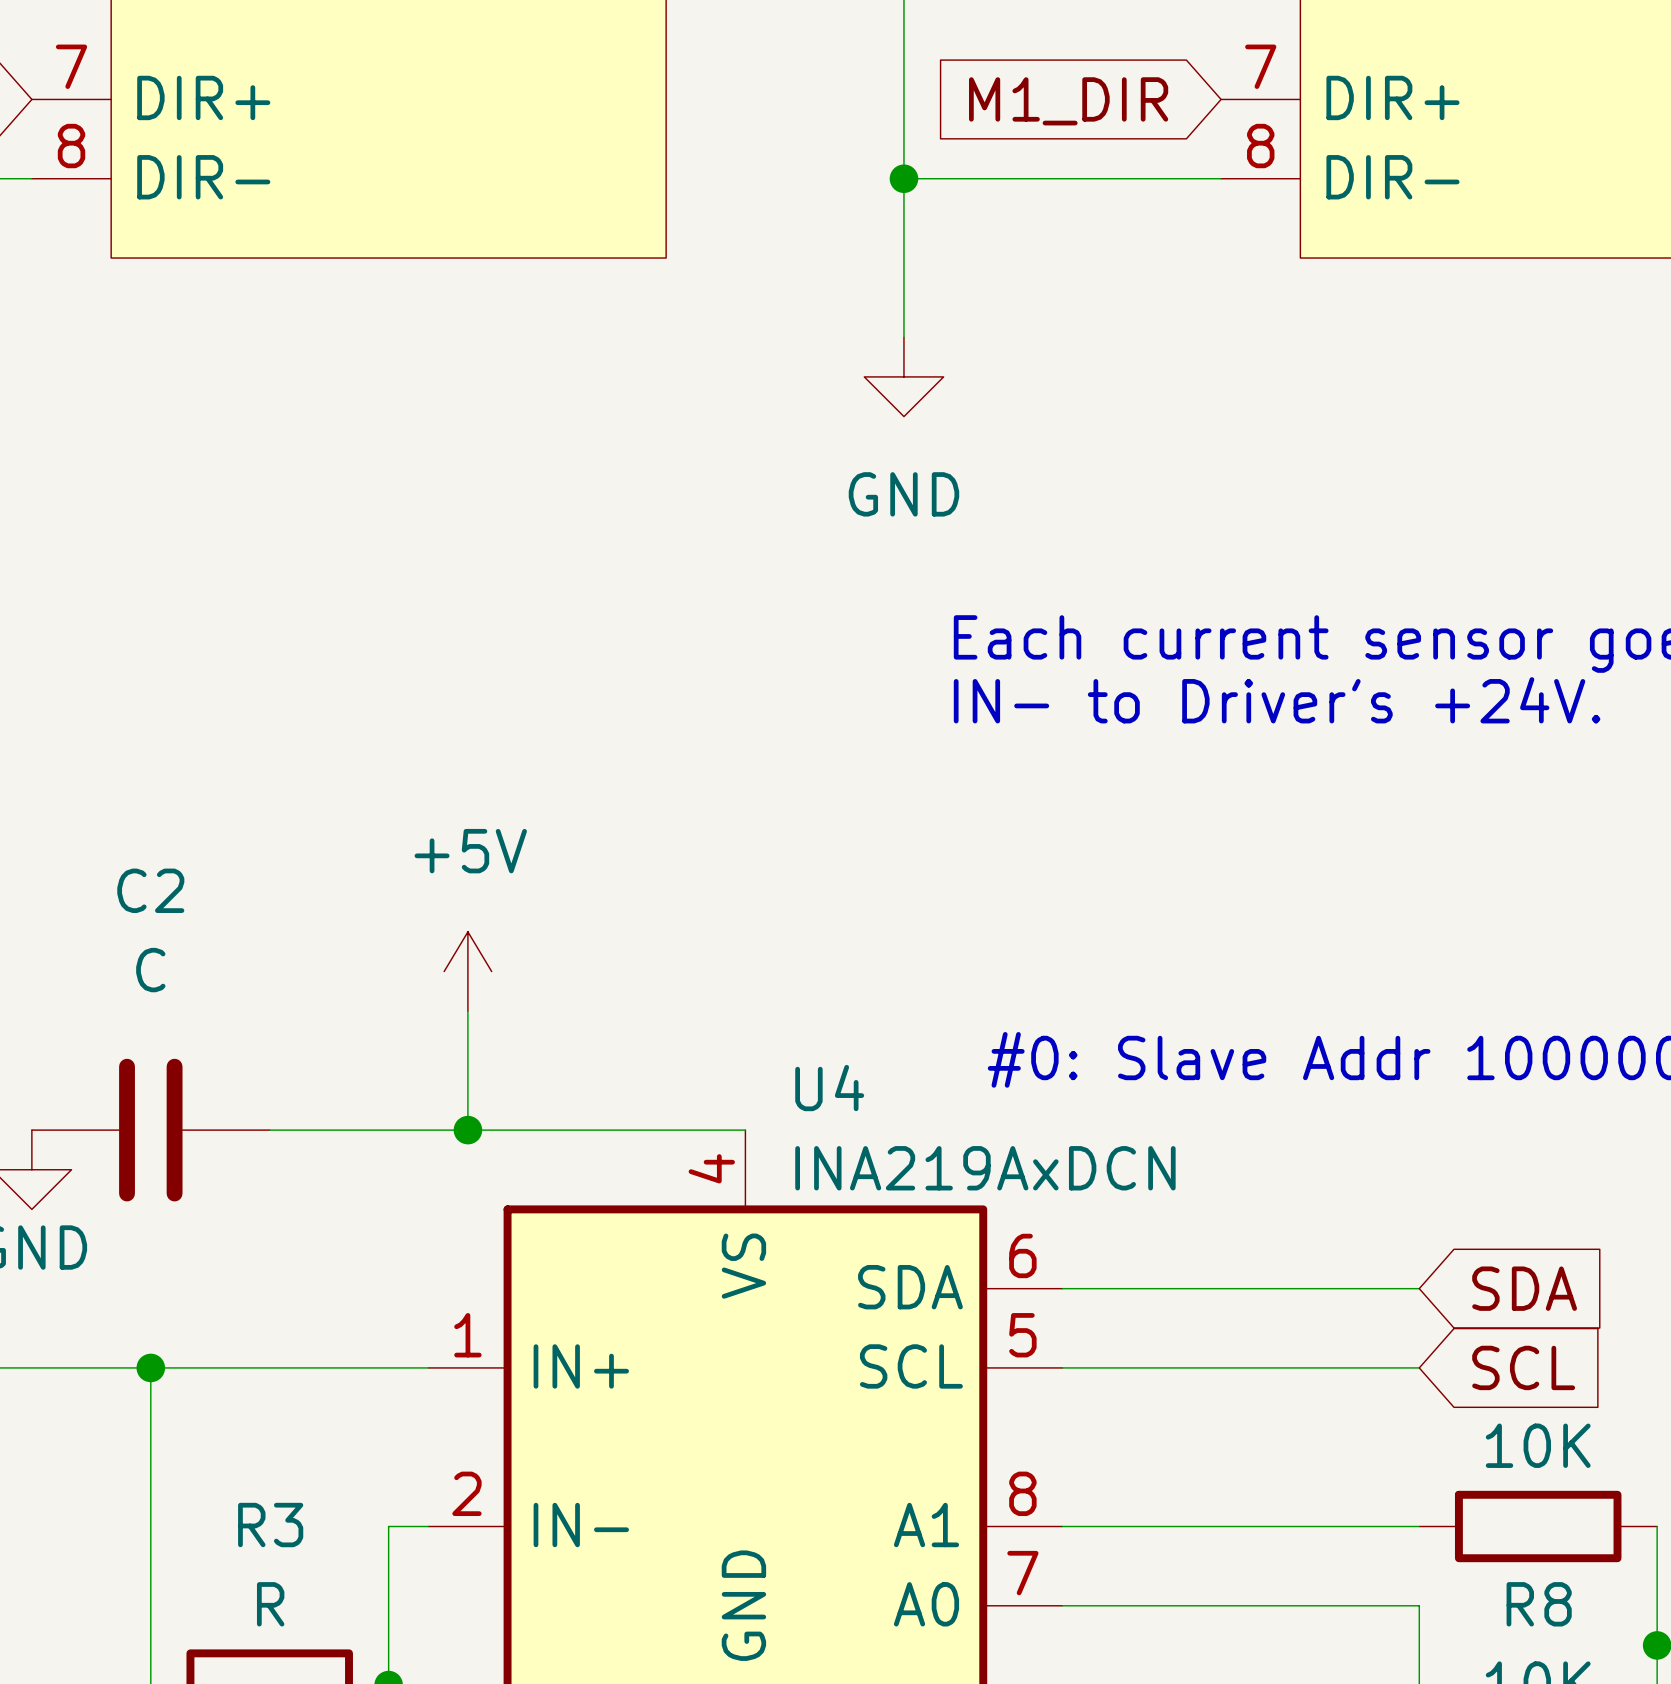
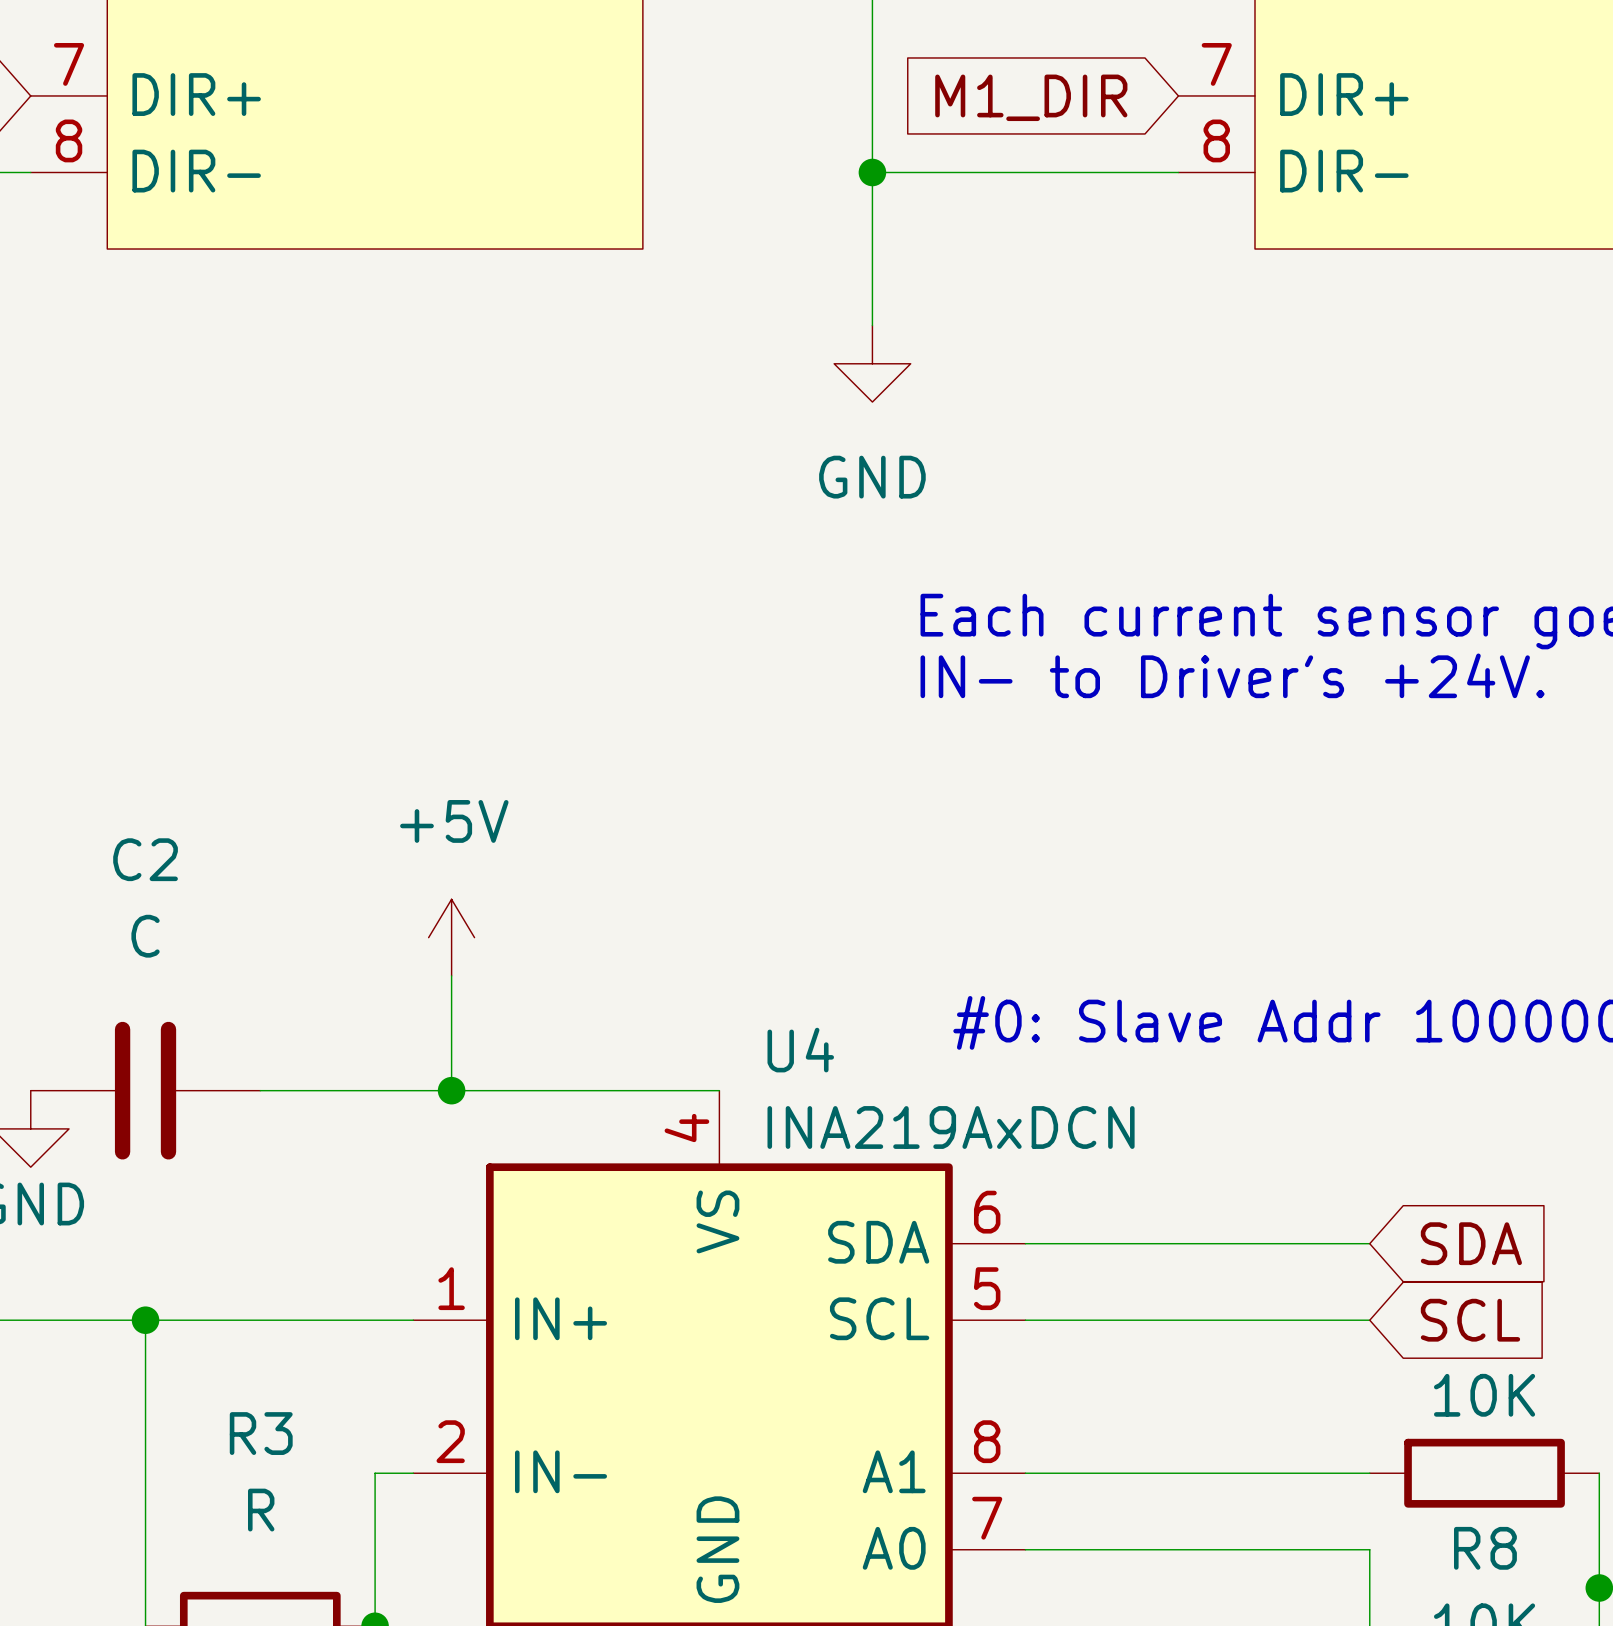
R3 name position: R3 (270, 1525) -> R3 (261, 1433)
R3 value position: R (270, 1604) -> R (261, 1510)

